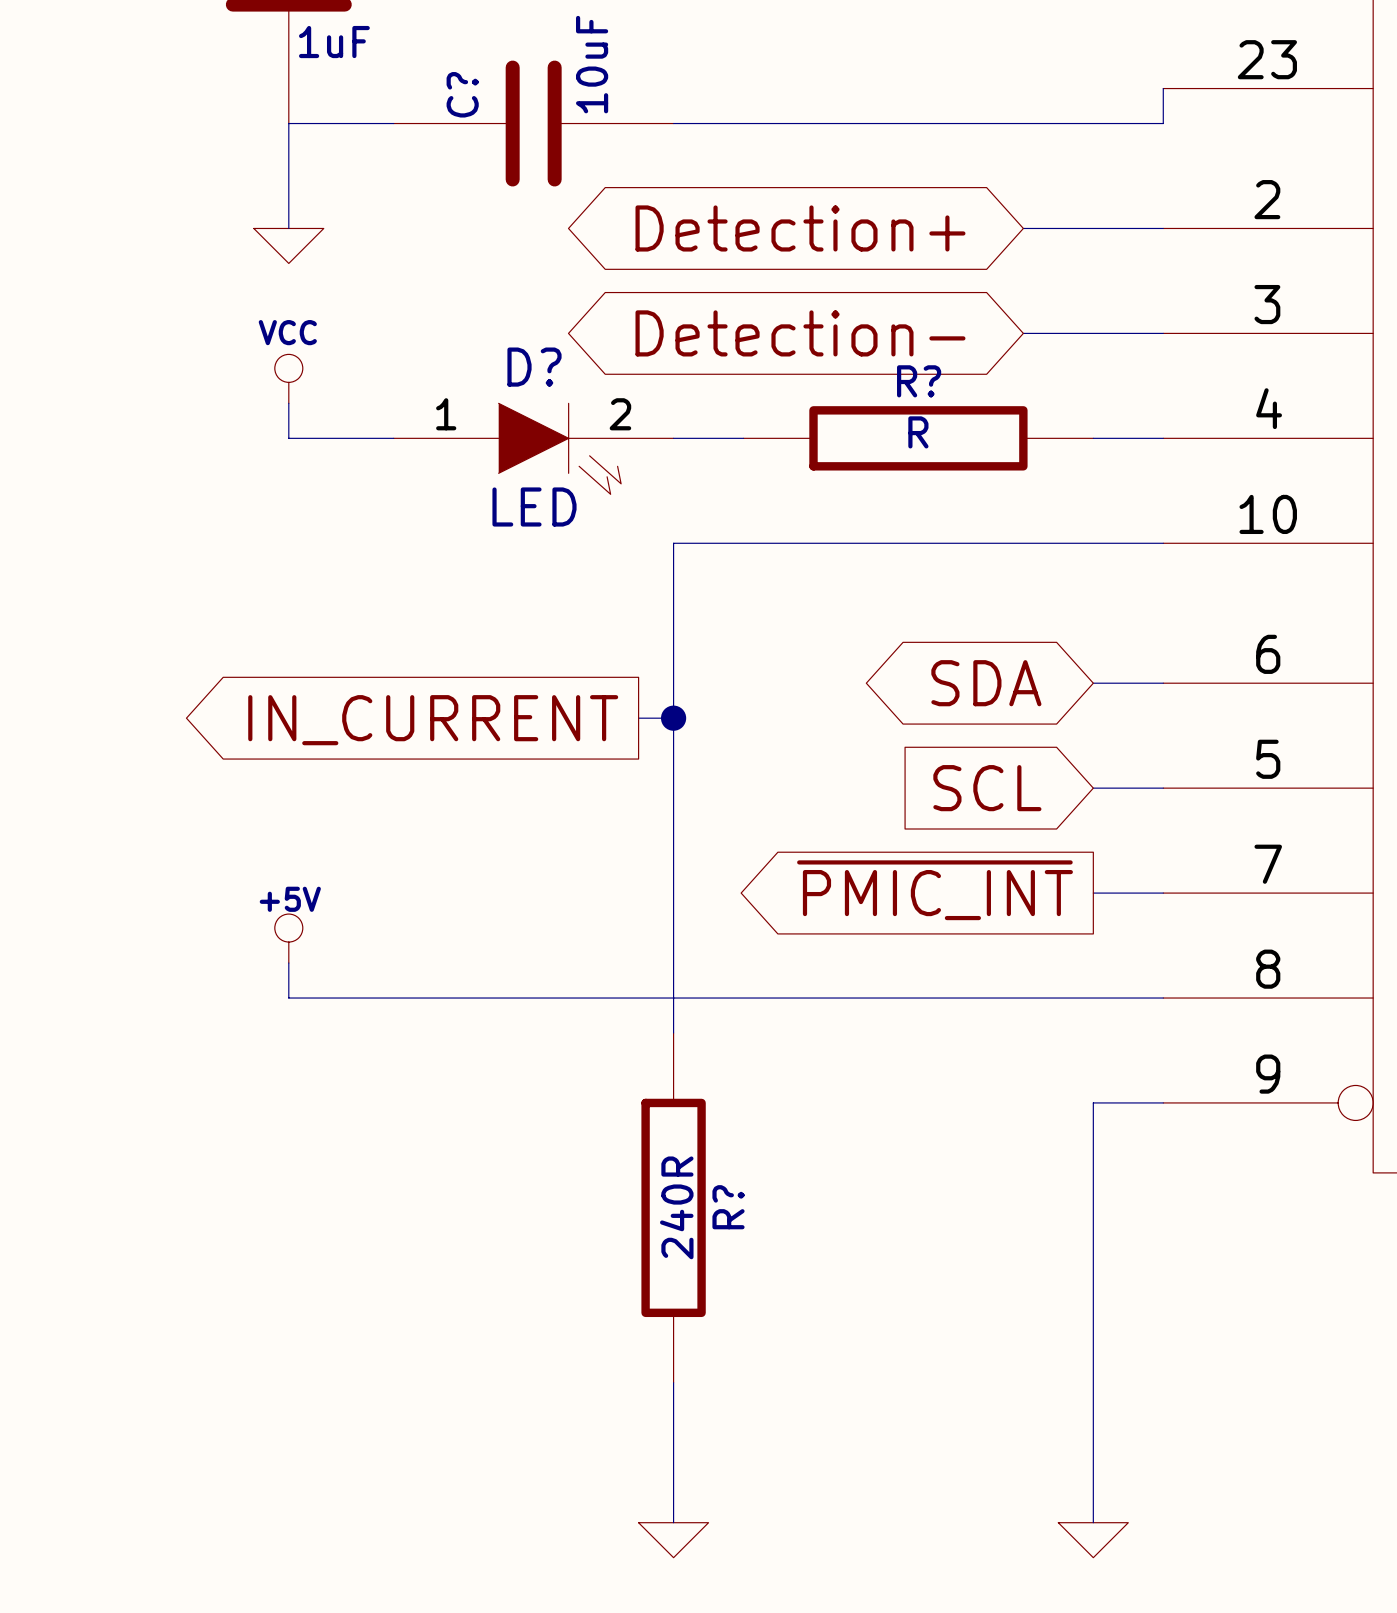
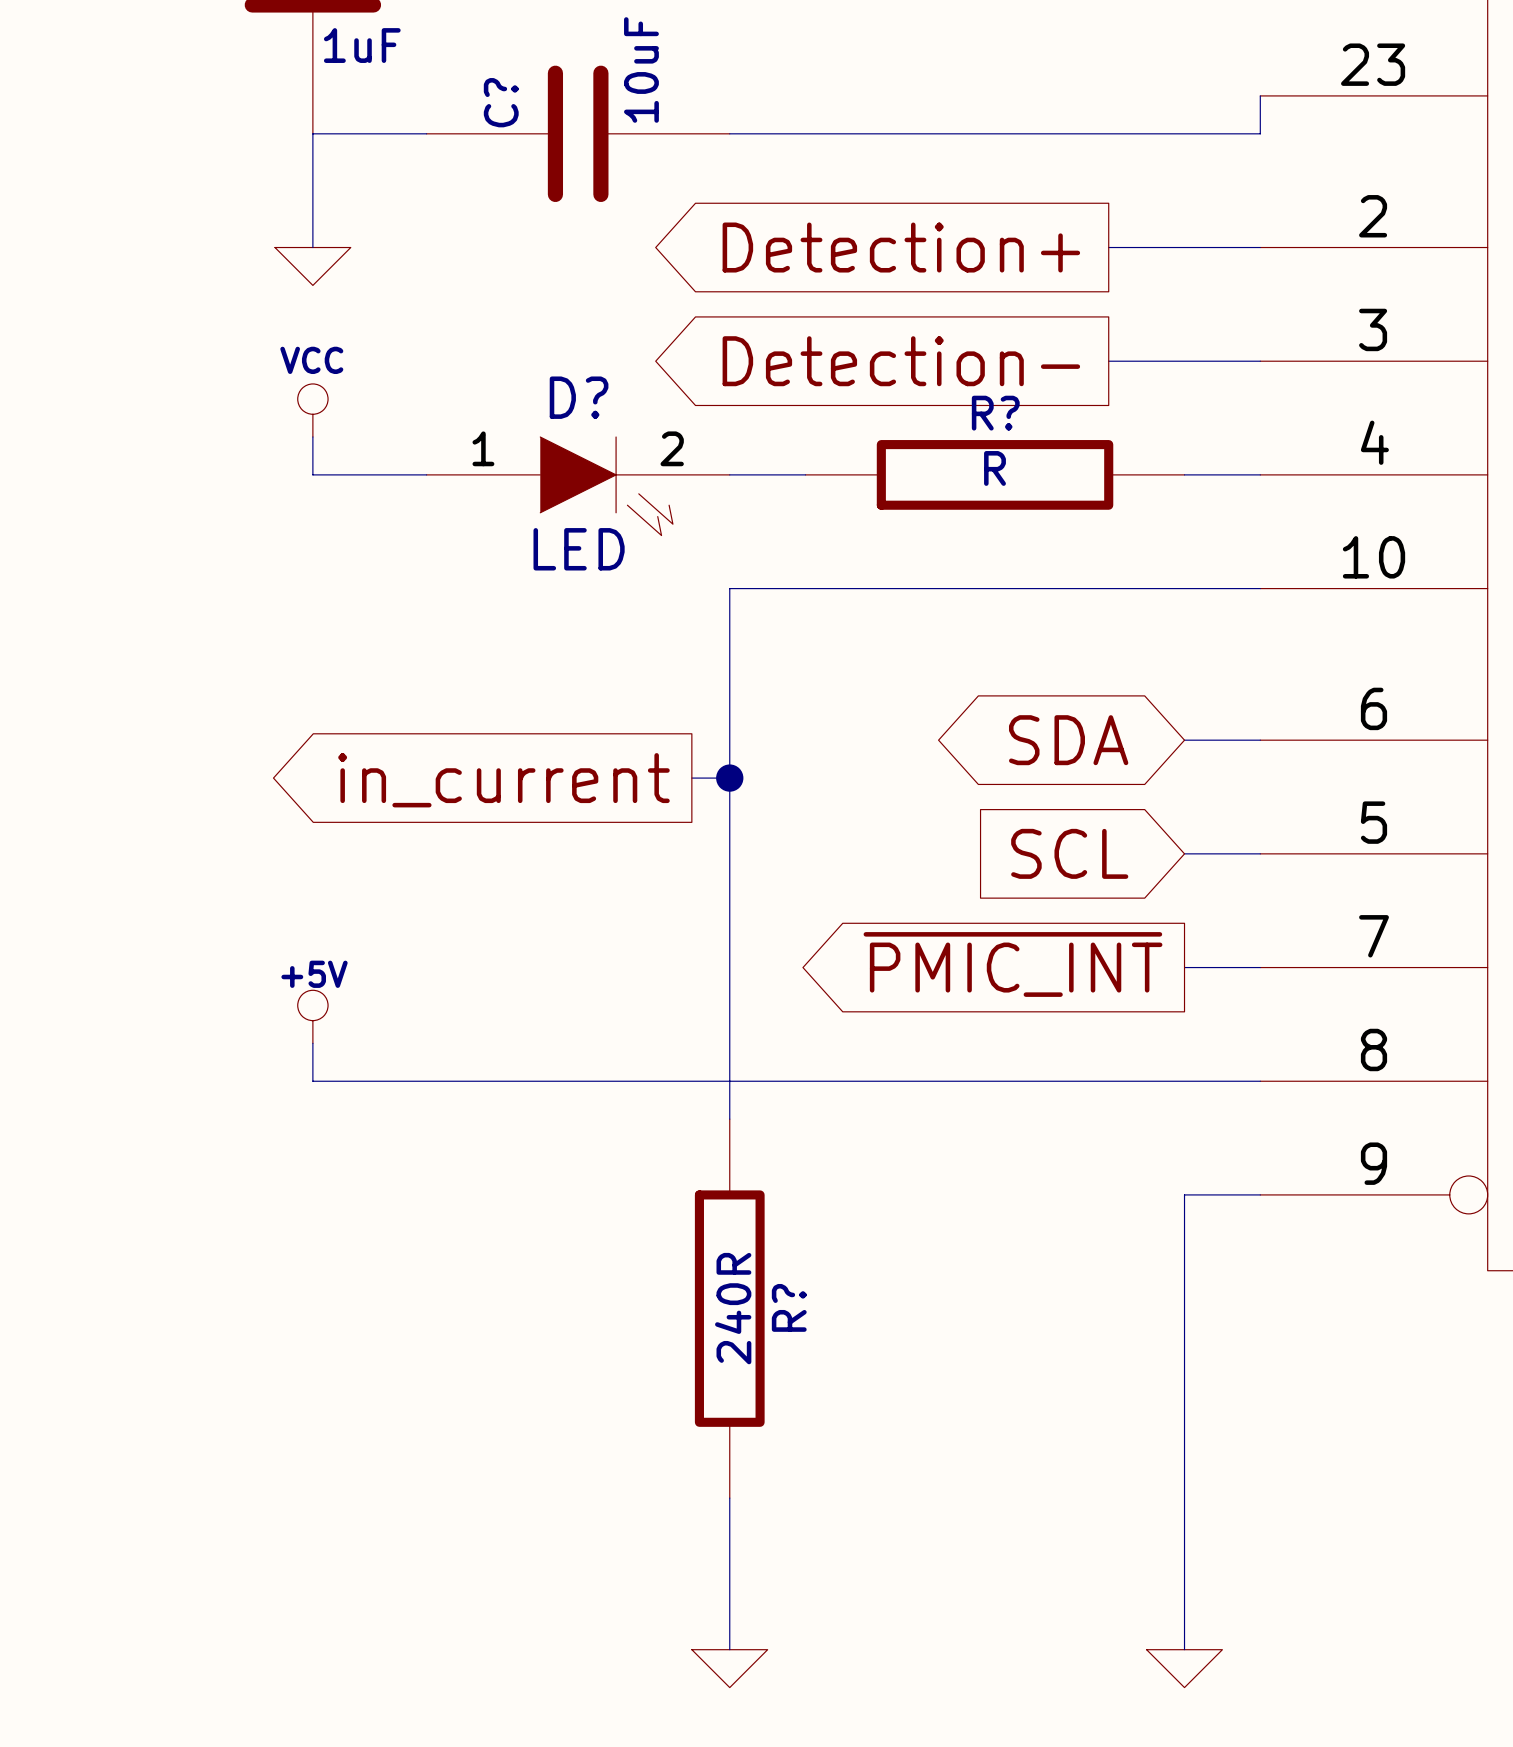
global label shape: bidirectional (800, 228) -> output (901, 247)
global label shape: bidirectional (800, 333) -> output (901, 361)
global label: IN_CURRENT (433, 720) -> in_current (503, 780)

